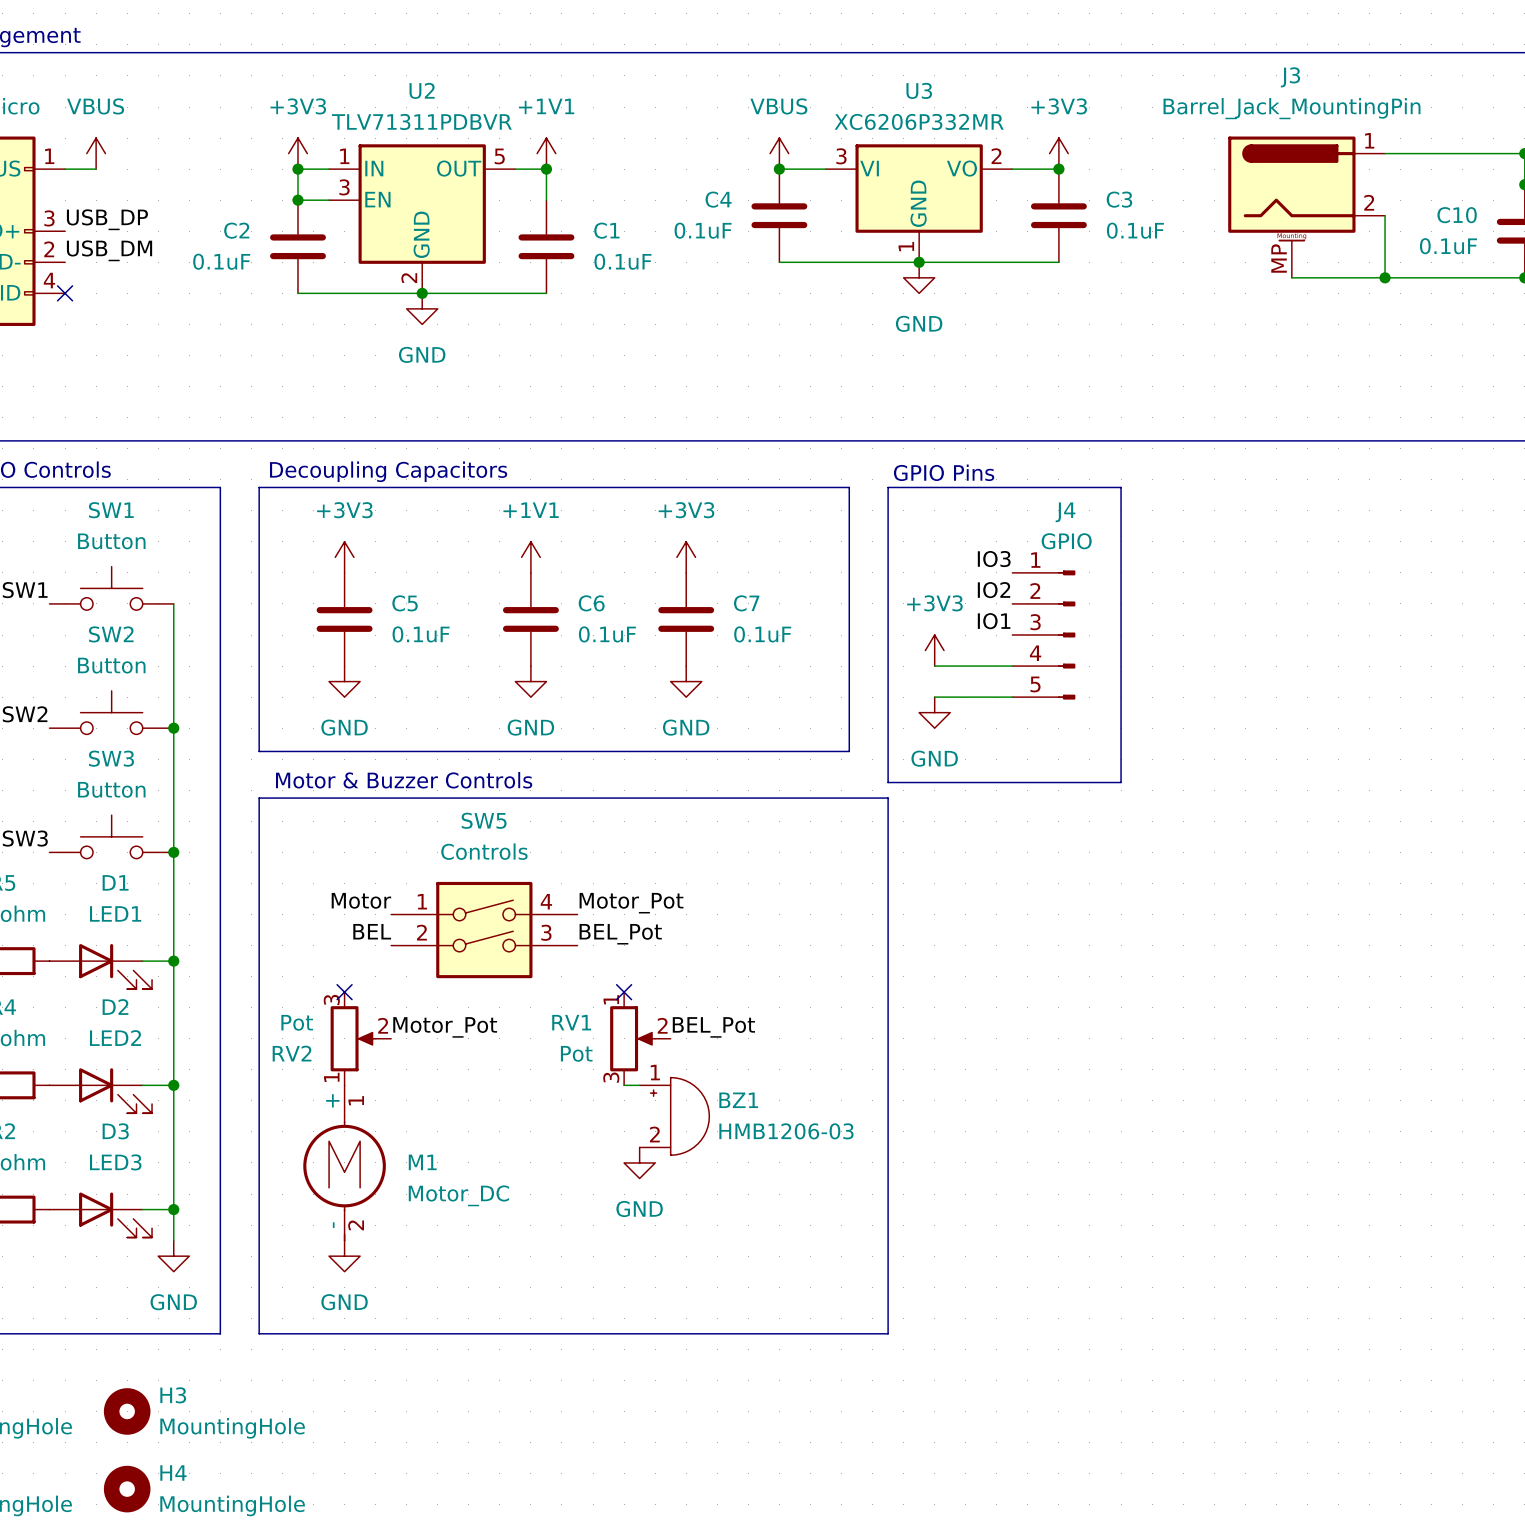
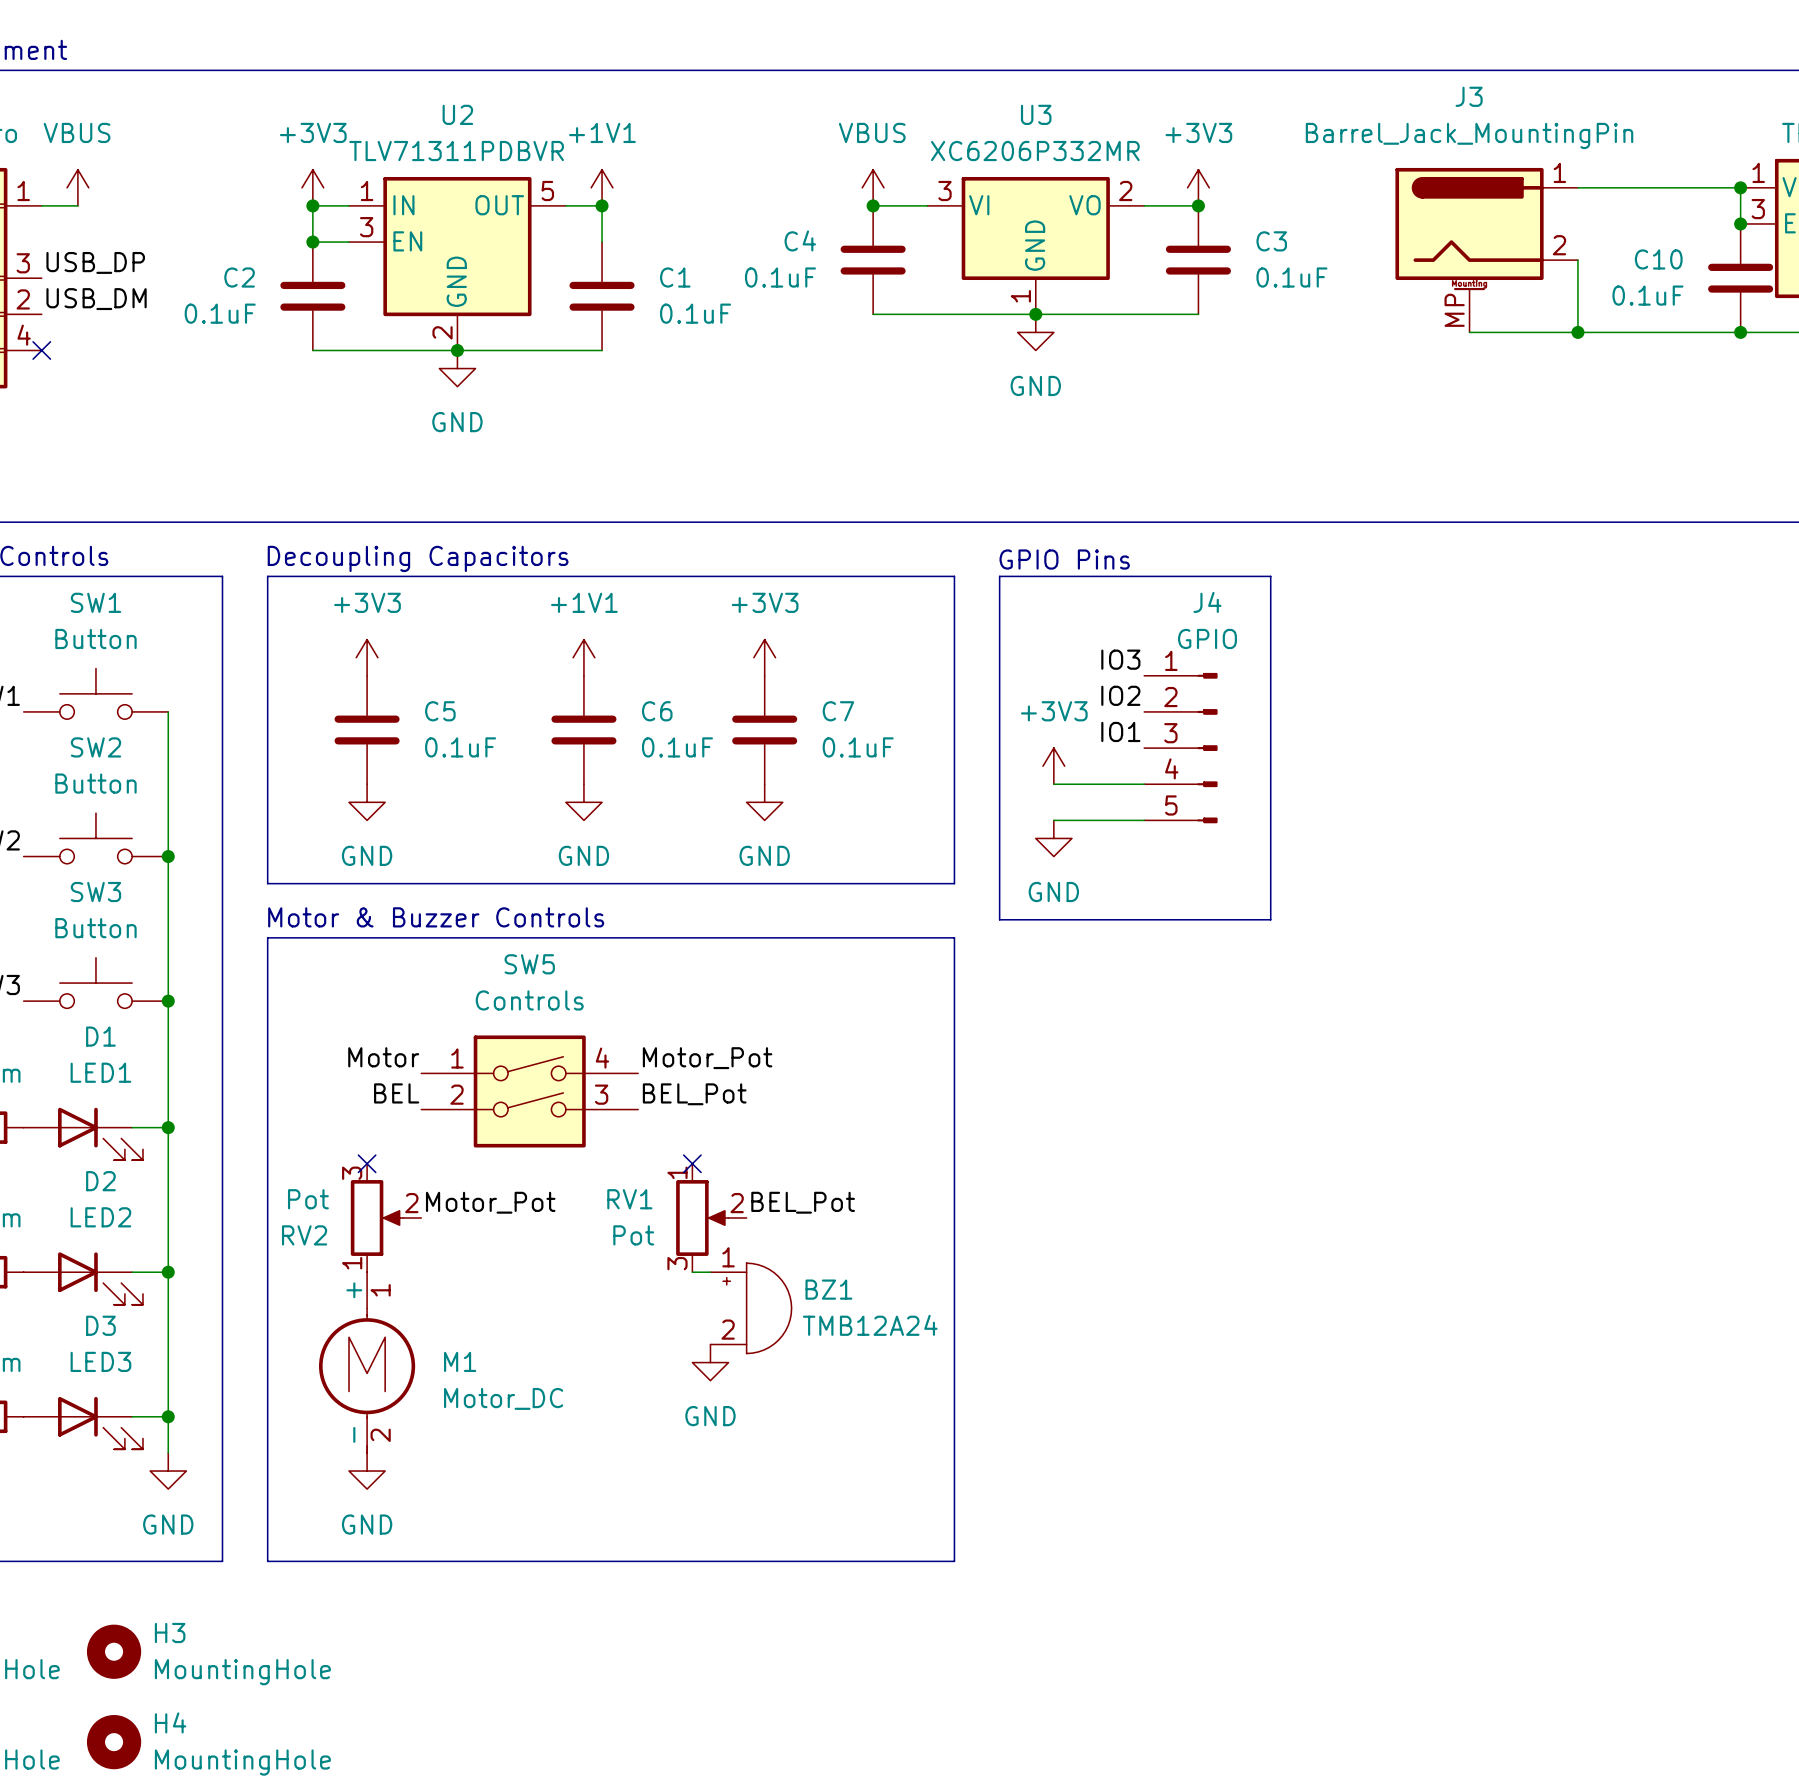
line: (849, 798) (888, 798) (888, 1333) (849, 1333) -> (954, 937) (954, 1561)
BZ1 value: HMB1206-03 (786, 1131) -> TMB12A24 (870, 1325)

